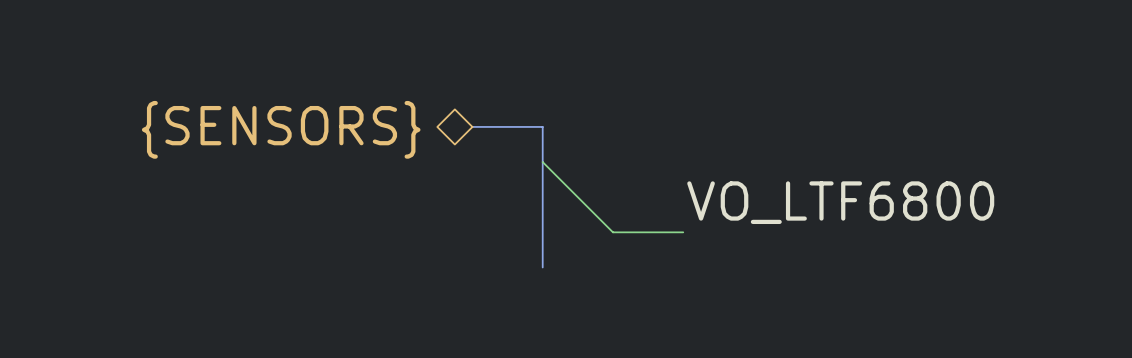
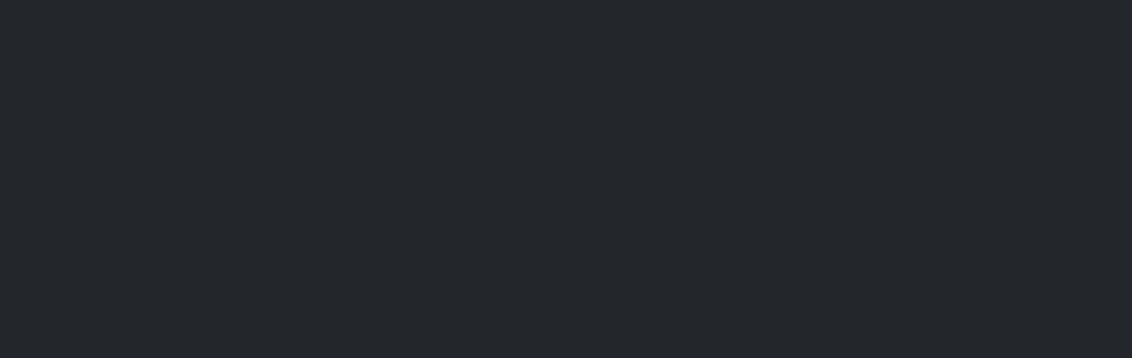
bus: (472, 126) (542, 126) (542, 267) -> none
hierarchical label: {SENSORS} (281, 129) -> none
wire: (542, 162) (612, 232) (683, 232) -> none
label: VO_LTF6800 (840, 202) -> none

